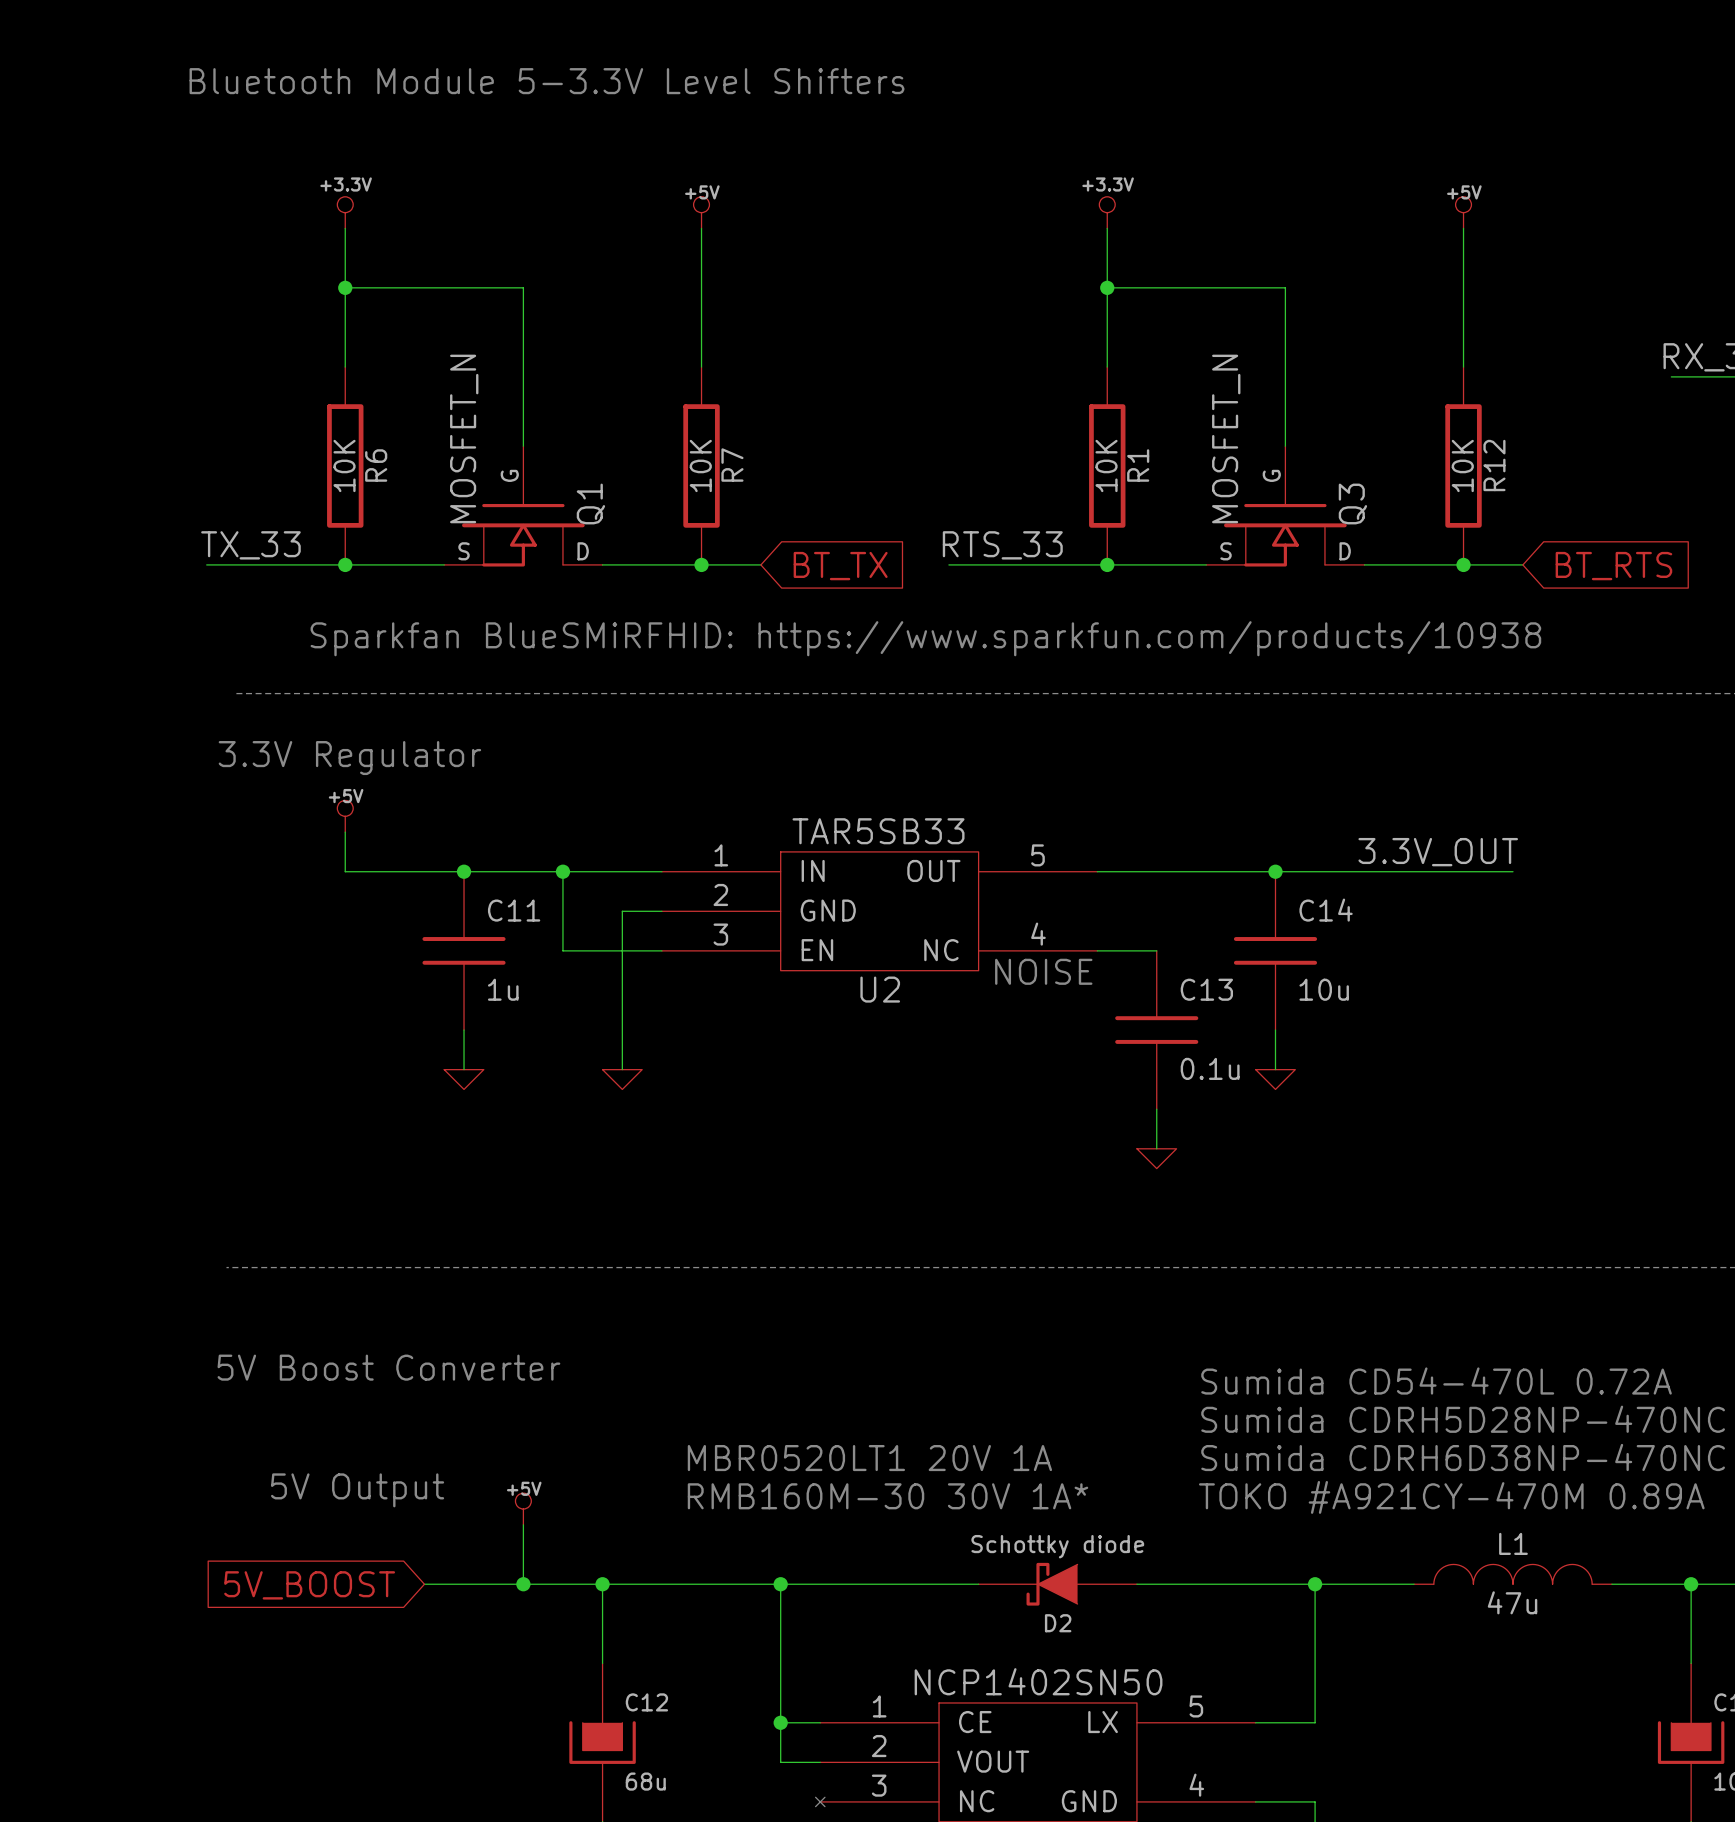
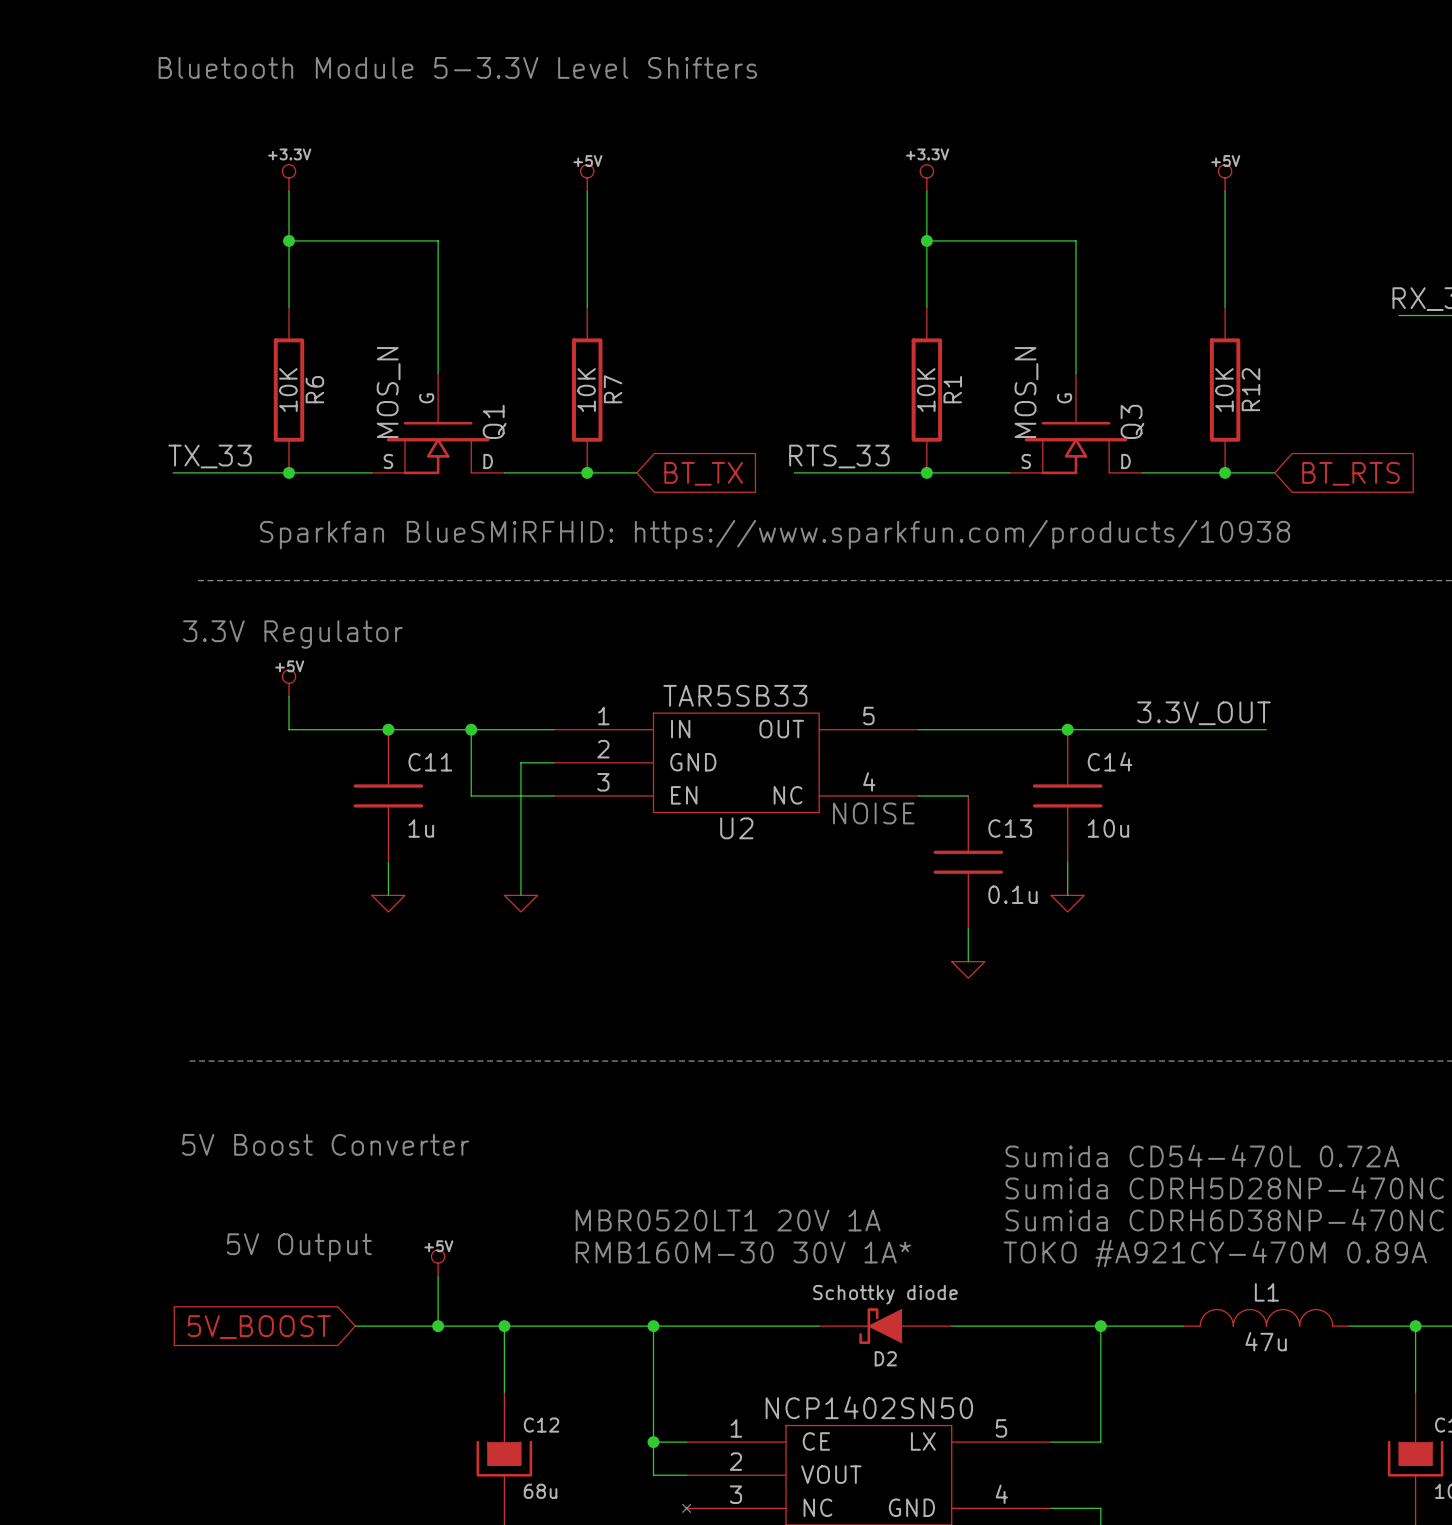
Q1 value: MOSFET_N (464, 438) -> MOS_N (388, 392)
Q3 value: MOSFET_N (1226, 438) -> MOS_N (1026, 392)

